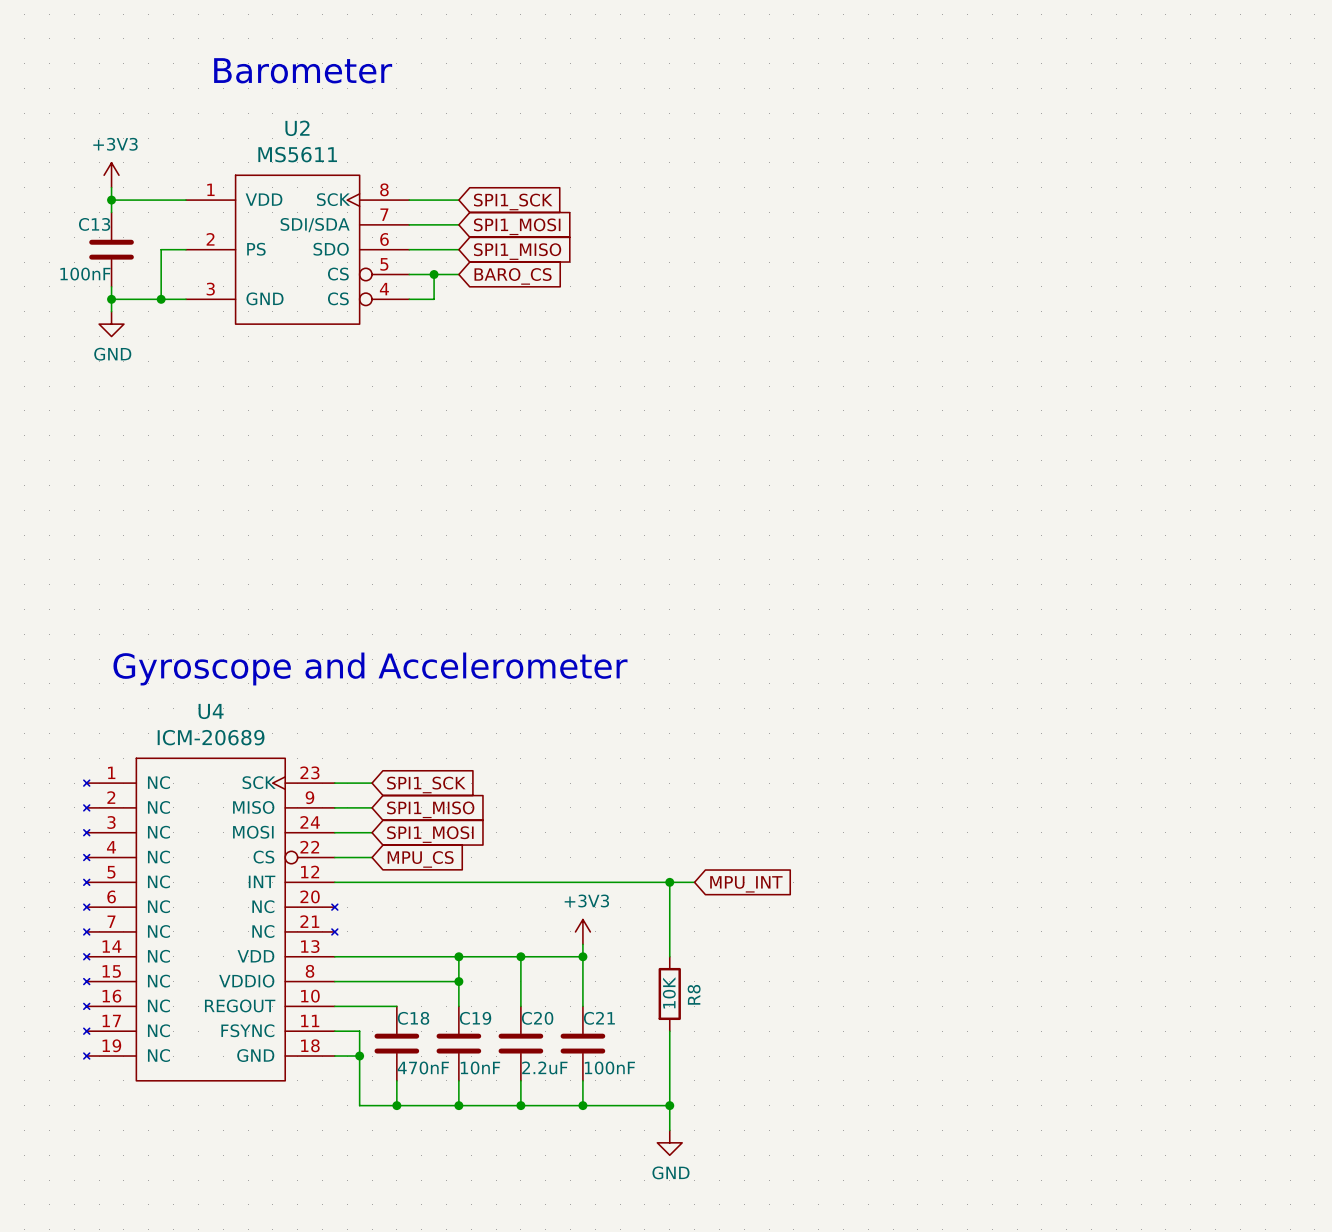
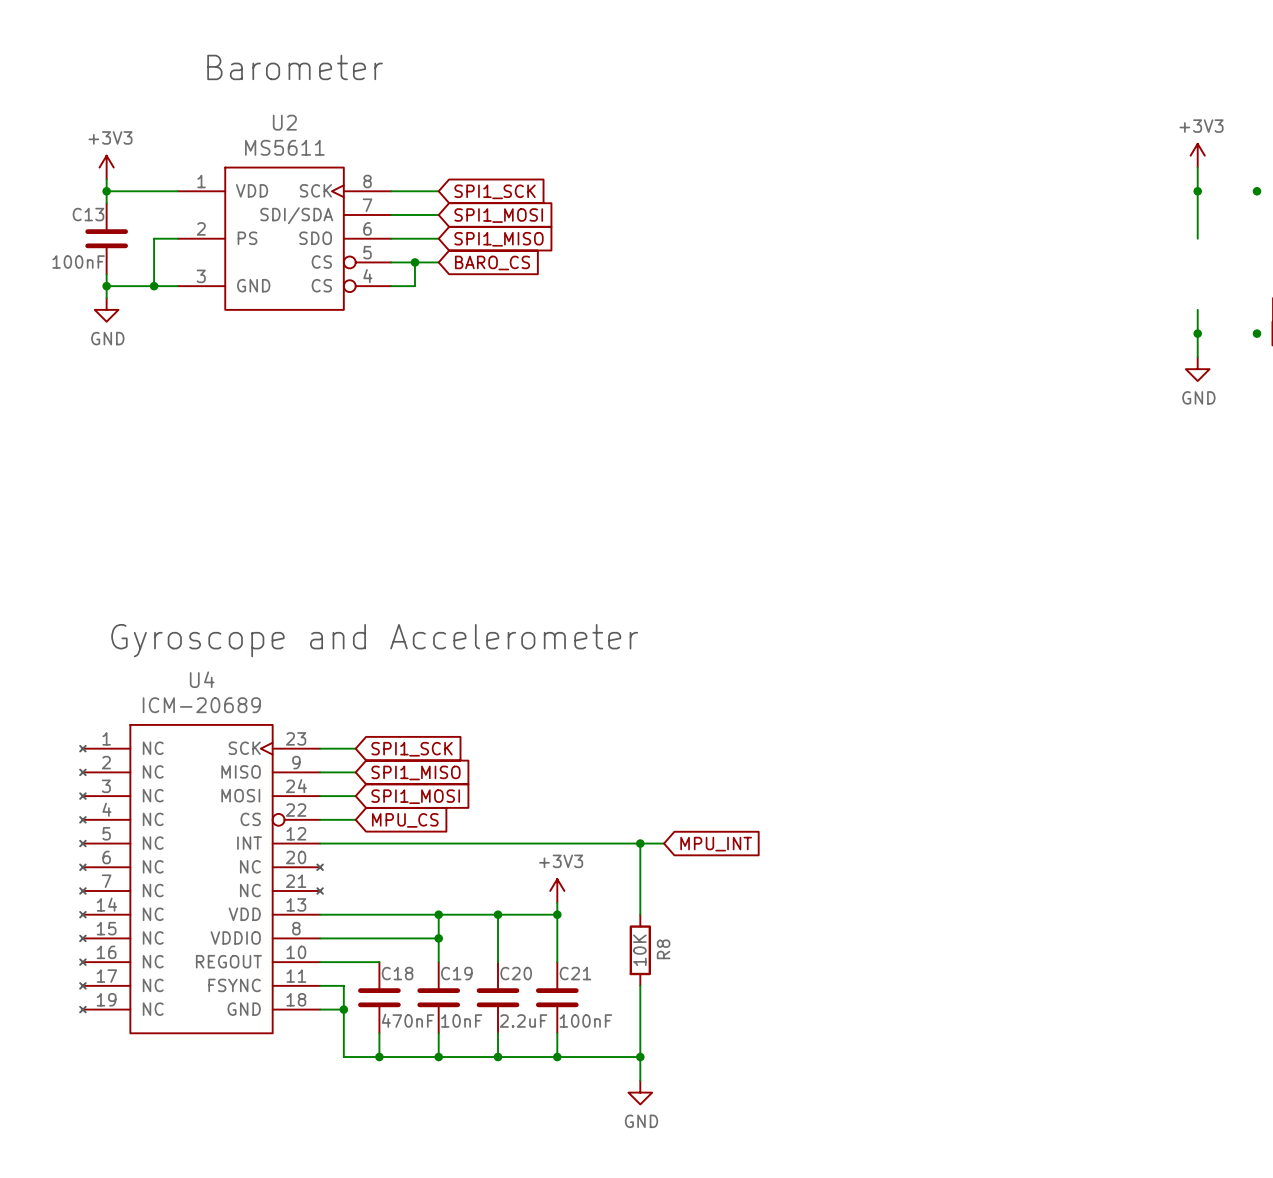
power symbol: none -> +3V3 (1197, 155)
wire: none -> (1197, 167) (1197, 238)
junction: none -> (1197, 191)
junction: none -> (1257, 191)
wire: none -> (1197, 309) (1197, 357)
junction: none -> (1197, 333)
junction: none -> (1257, 333)
power symbol: none -> GND (1197, 369)

